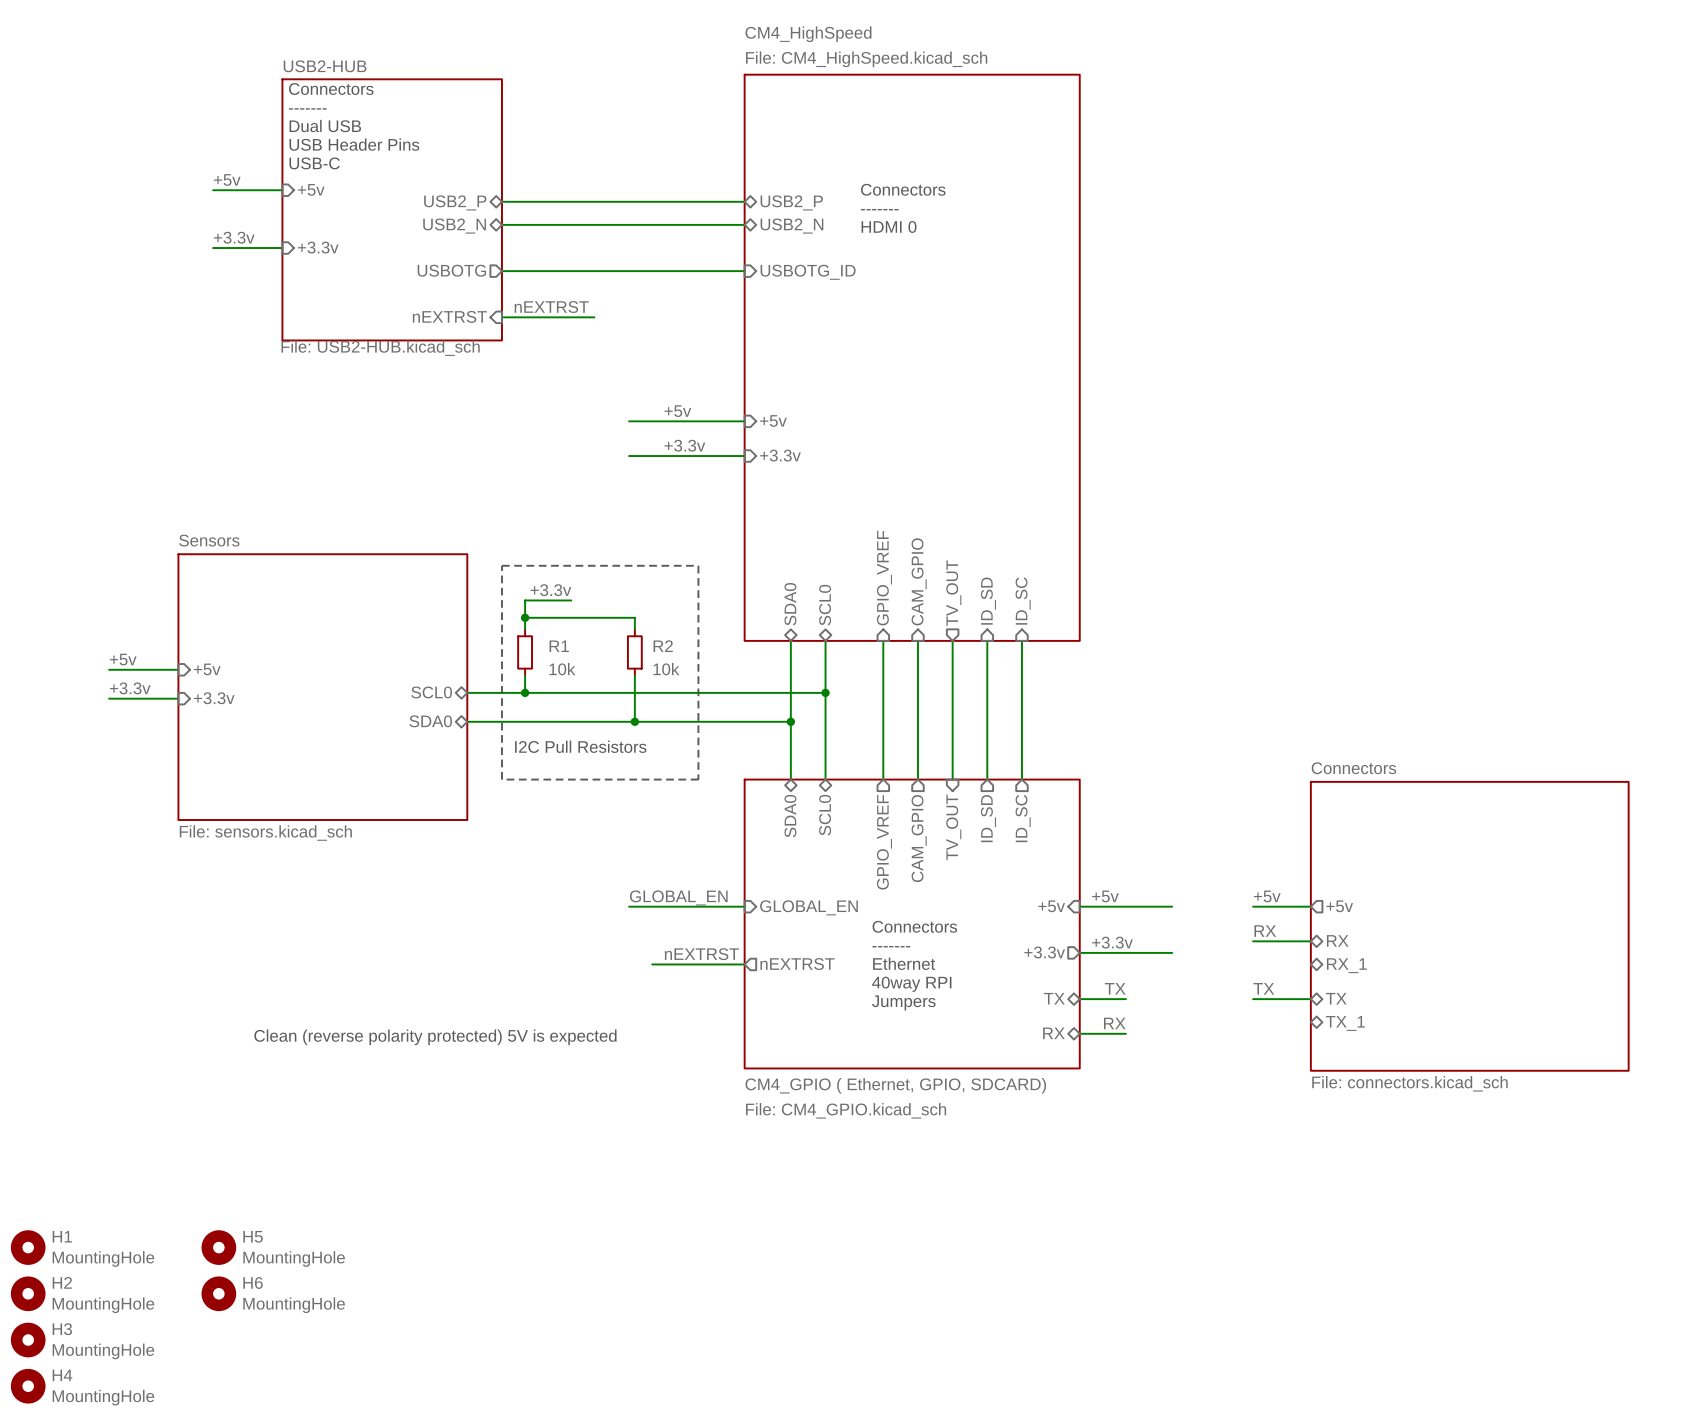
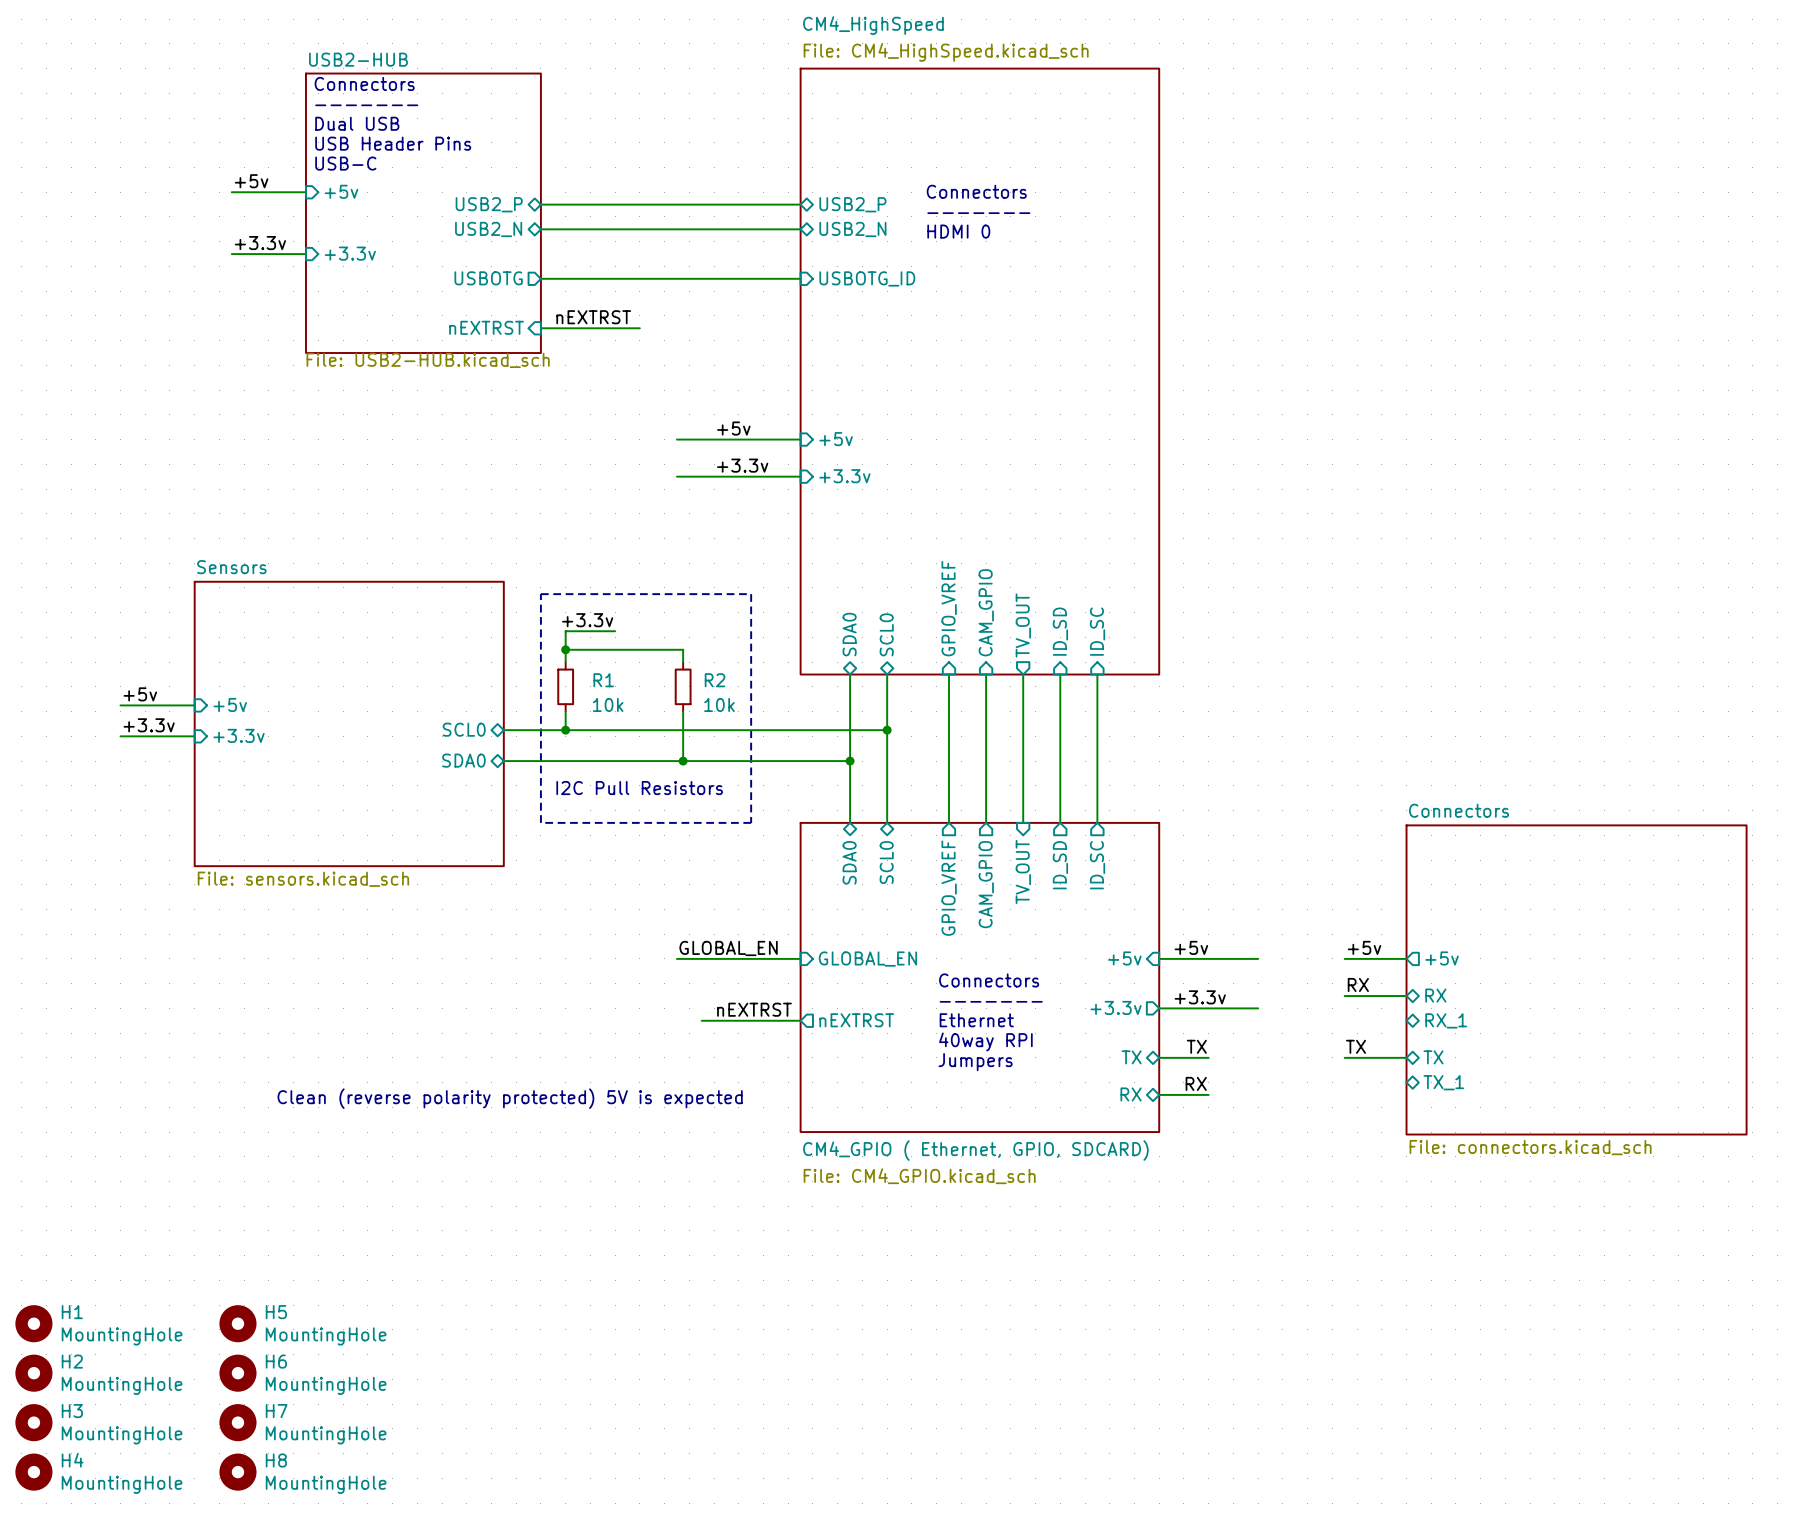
H7: none -> MountingHole (237, 1422)
H8: none -> MountingHole (237, 1472)

